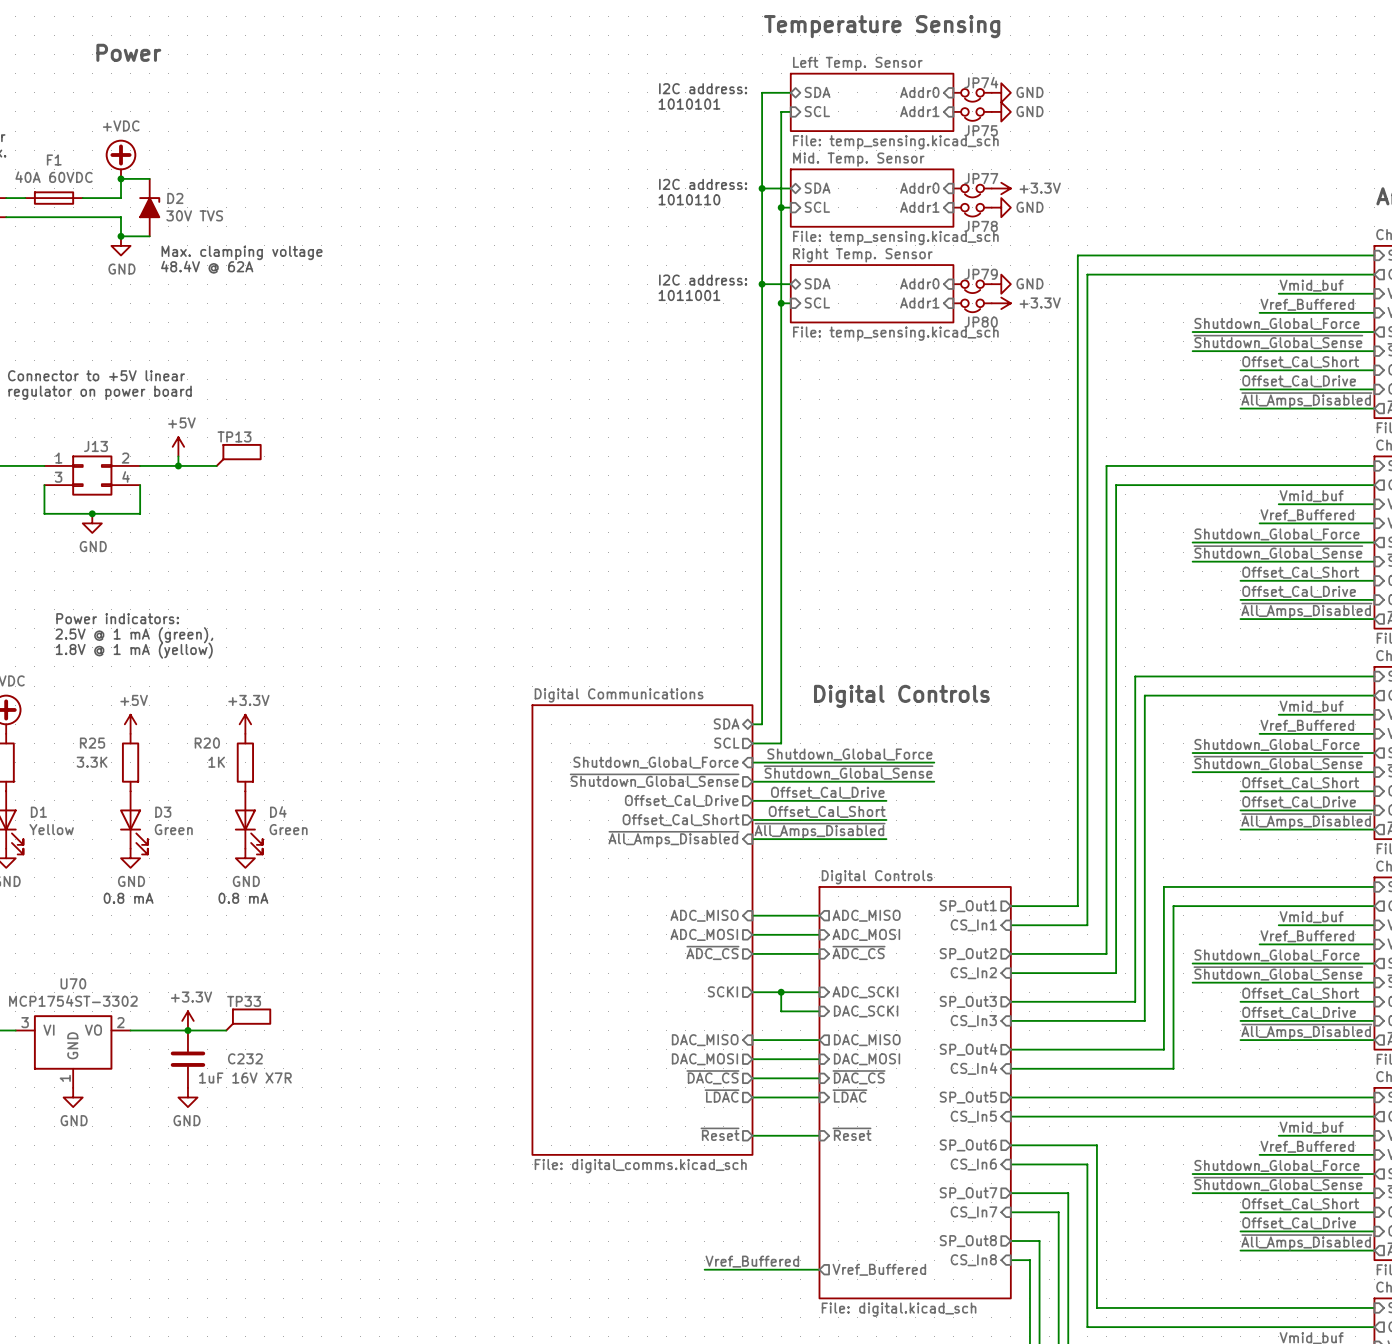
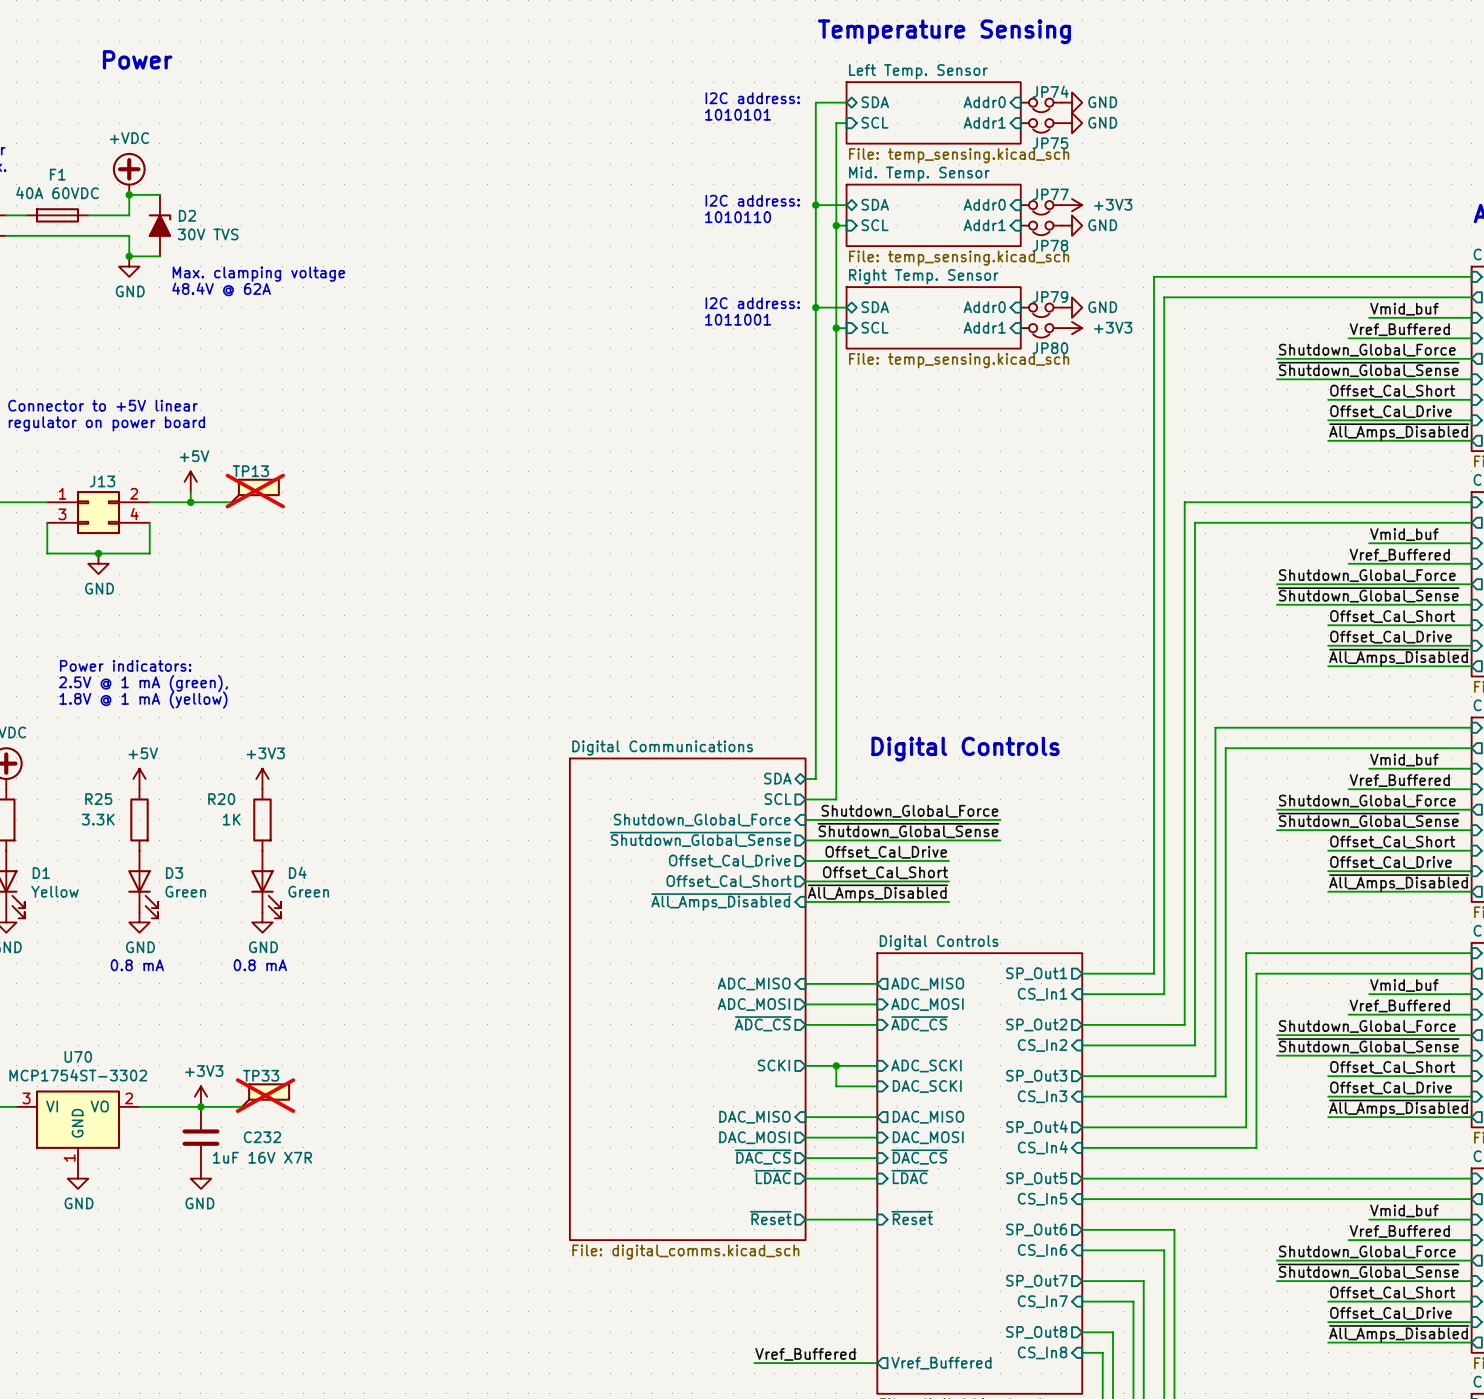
power symbol: +3.3V (1001, 188) -> +3V3 (1072, 205)
power symbol: +3.3V (1001, 303) -> +3V3 (1072, 328)
TP13 do-not-place cross: none -> (255, 491)
power symbol: +3.3V (245, 724) -> +3V3 (262, 778)
TP33 do-not-place cross: none -> (265, 1095)
power symbol: +3.3V (187, 1020) -> +3V3 (200, 1096)

